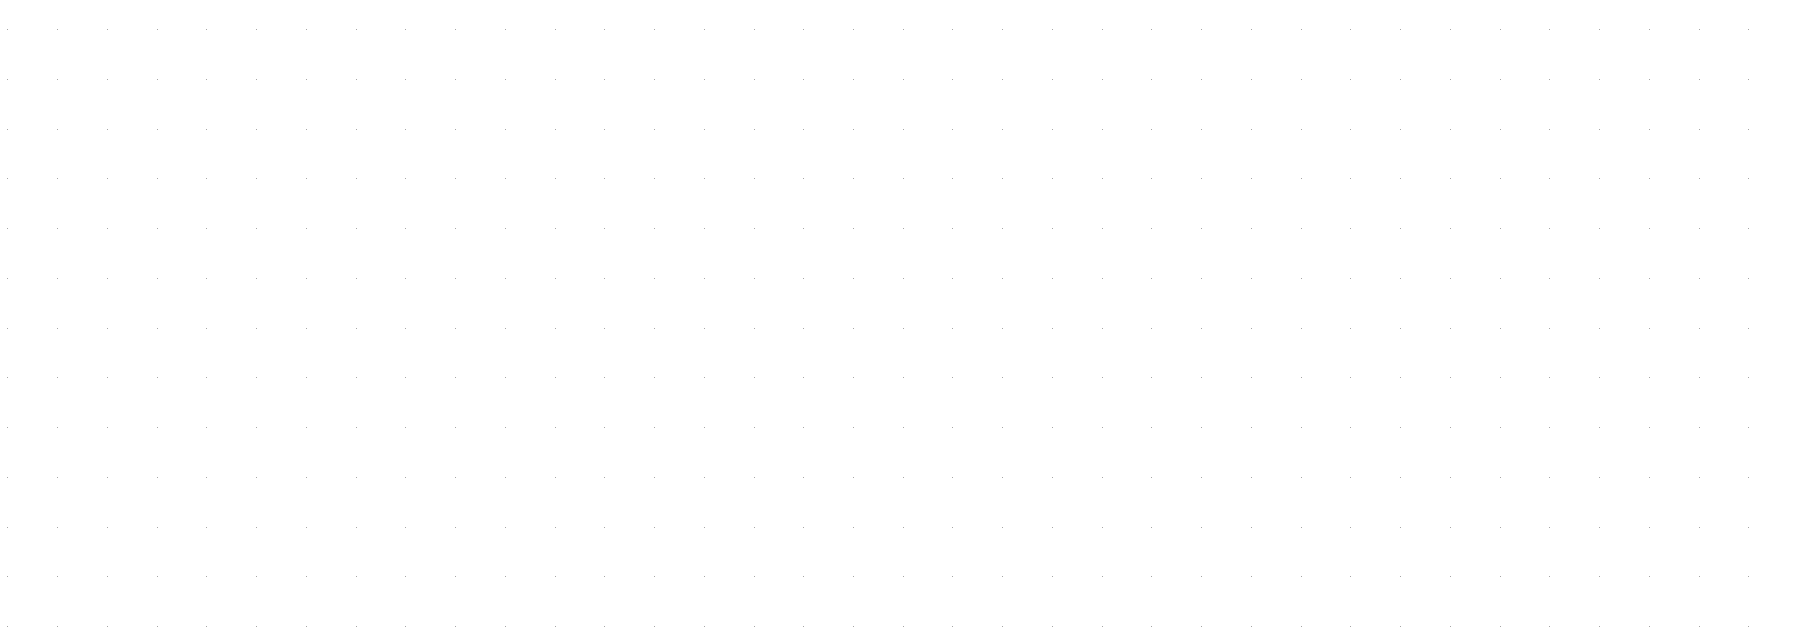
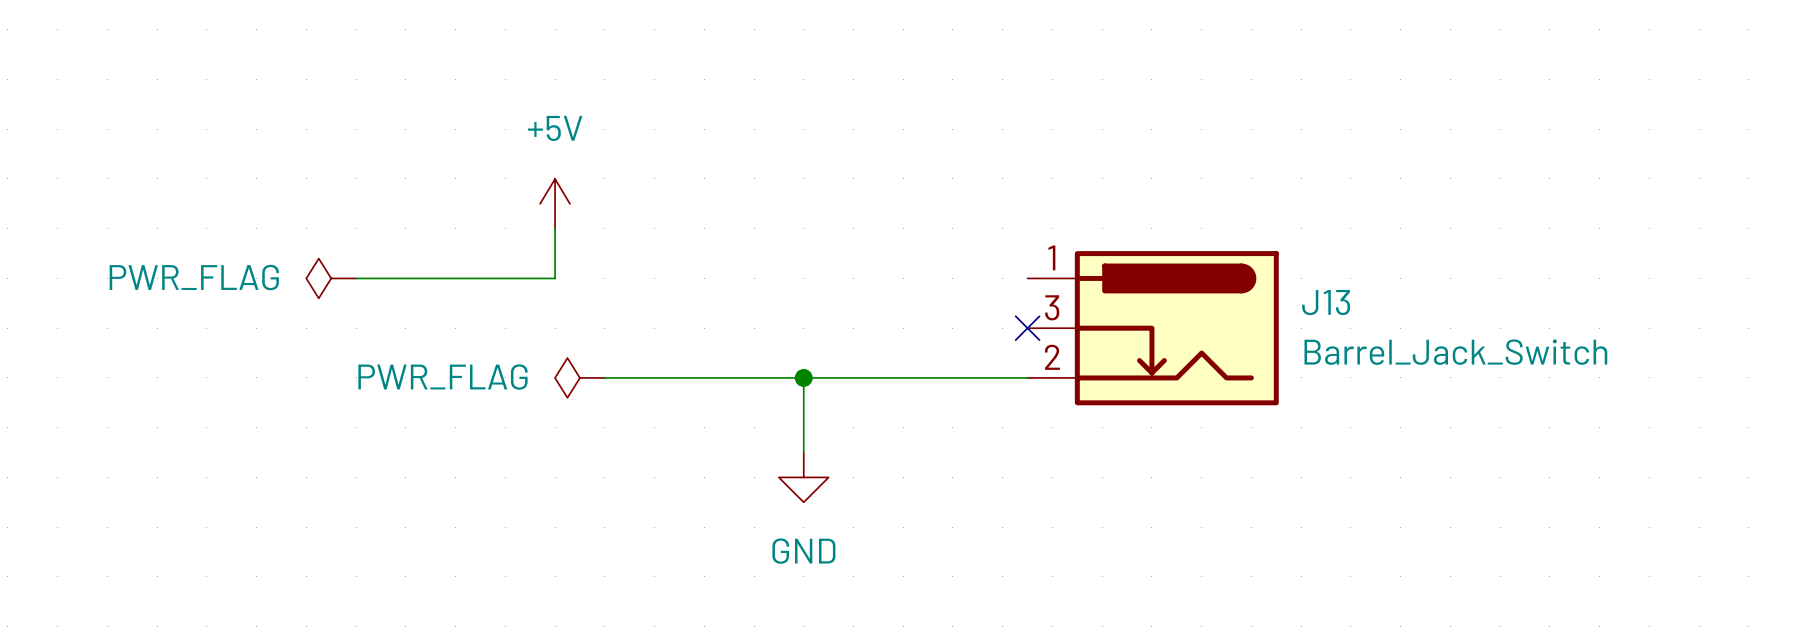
power symbol: none -> +5V (555, 203)
wire: none -> (555, 228) (555, 278) (356, 278)
power symbol: none -> PWR_FLAG (331, 278)
no-connect mark: none -> (1027, 328)
J13: none -> Barrel_Jack_Switch (1153, 328)
power symbol: none -> PWR_FLAG (579, 377)
wire: none -> (604, 377) (1027, 377)
wire: none -> (803, 377) (803, 452)
junction: none -> (803, 377)
power symbol: none -> GND (803, 477)

